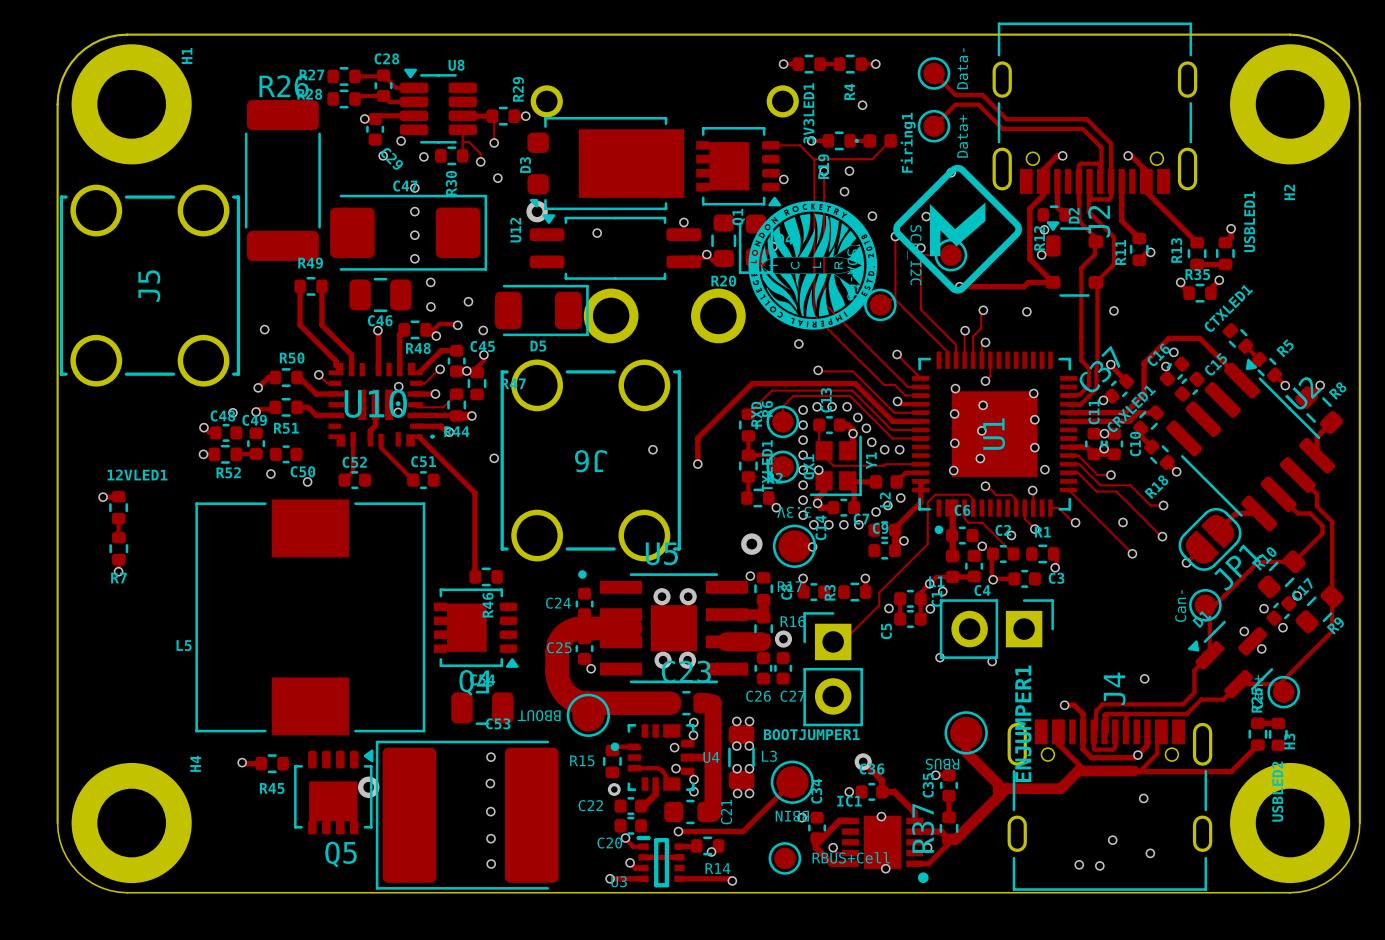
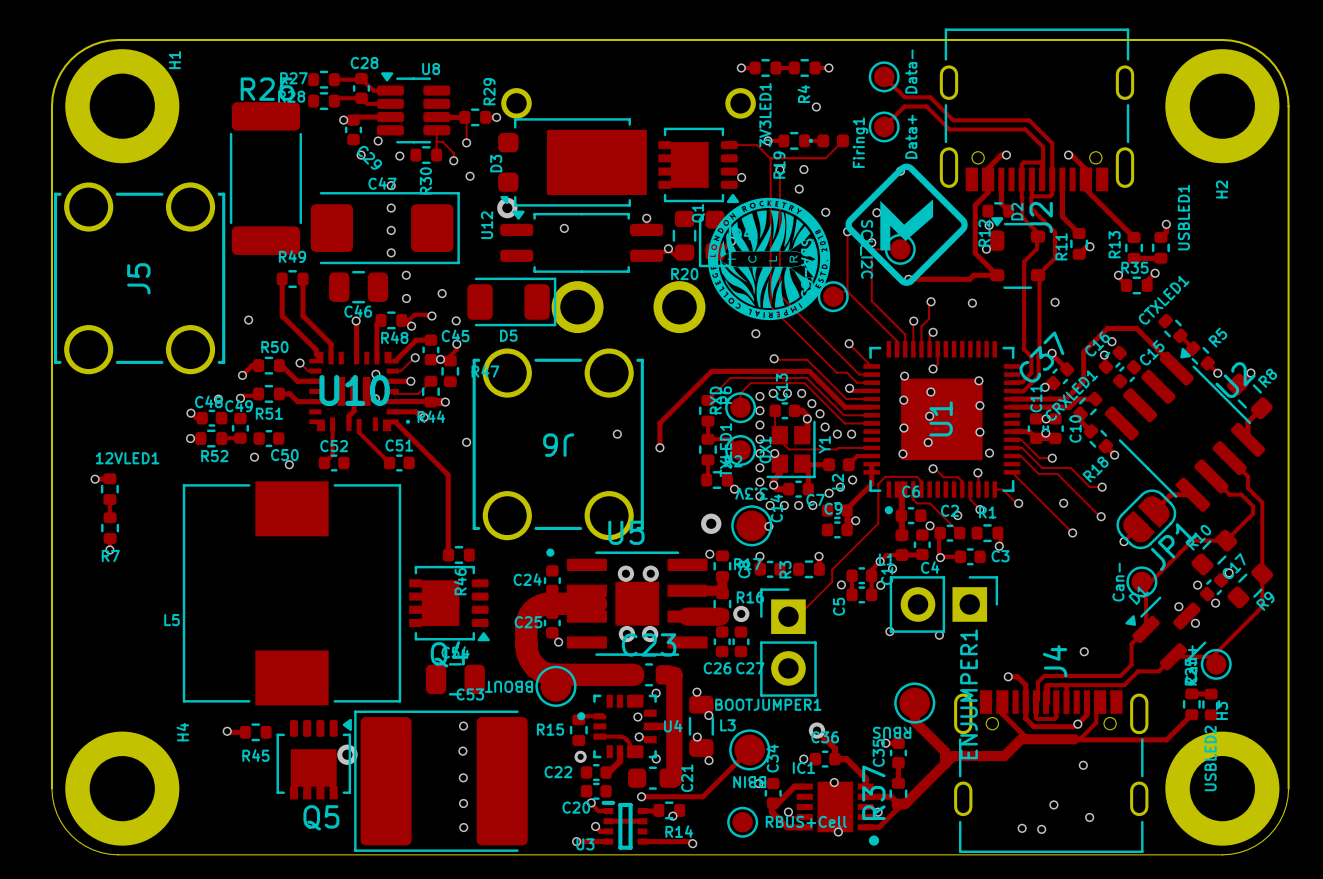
via: (749, 721) -> none
via: (693, 735) -> none
via: (736, 746) -> none
via: (749, 768) -> none
via: (694, 779) -> none
via: (737, 793) -> none

